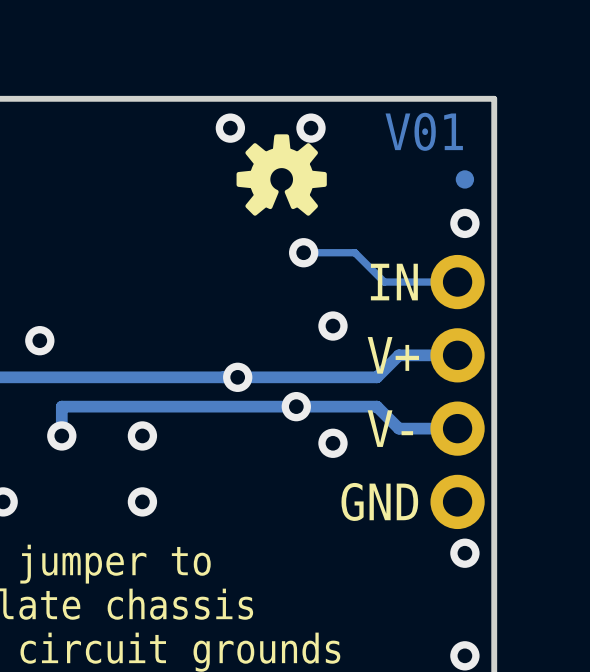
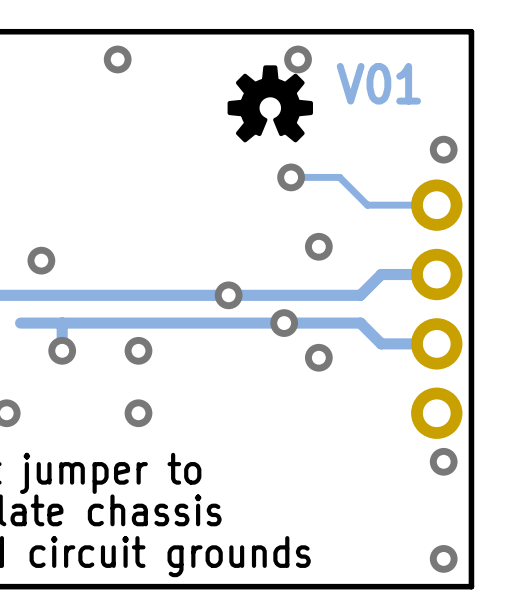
via position: (230, 128) -> (117, 59)
text position: V01 (424, 131) -> V01 (378, 83)
part: (464, 179) -> none
text: IN (394, 282) -> none
text: V+ (393, 355) -> none
track: none -> (62, 323) (20, 323)
text: V- (390, 428) -> none
text: GND (379, 501) -> none

